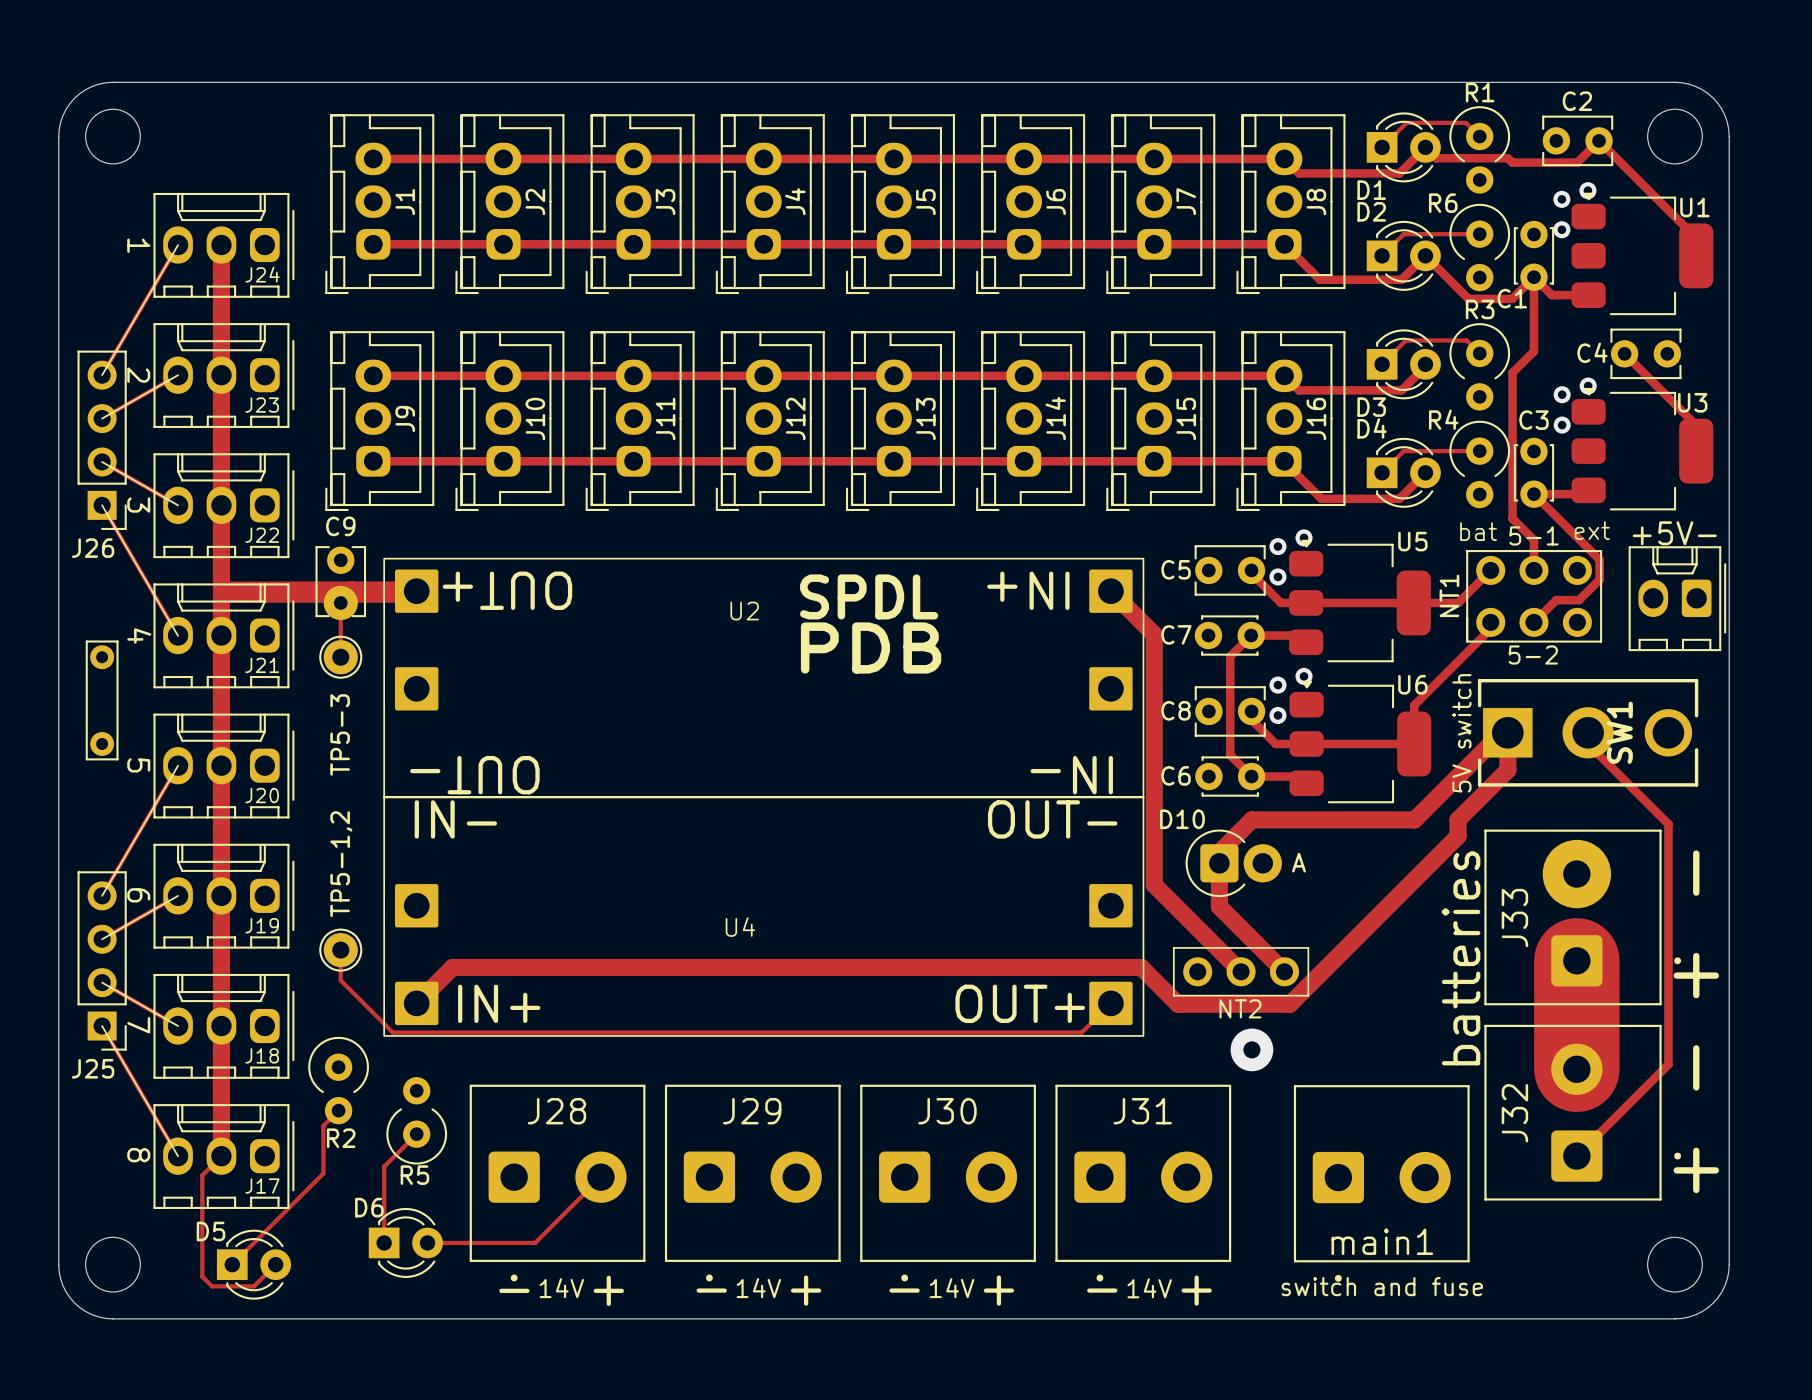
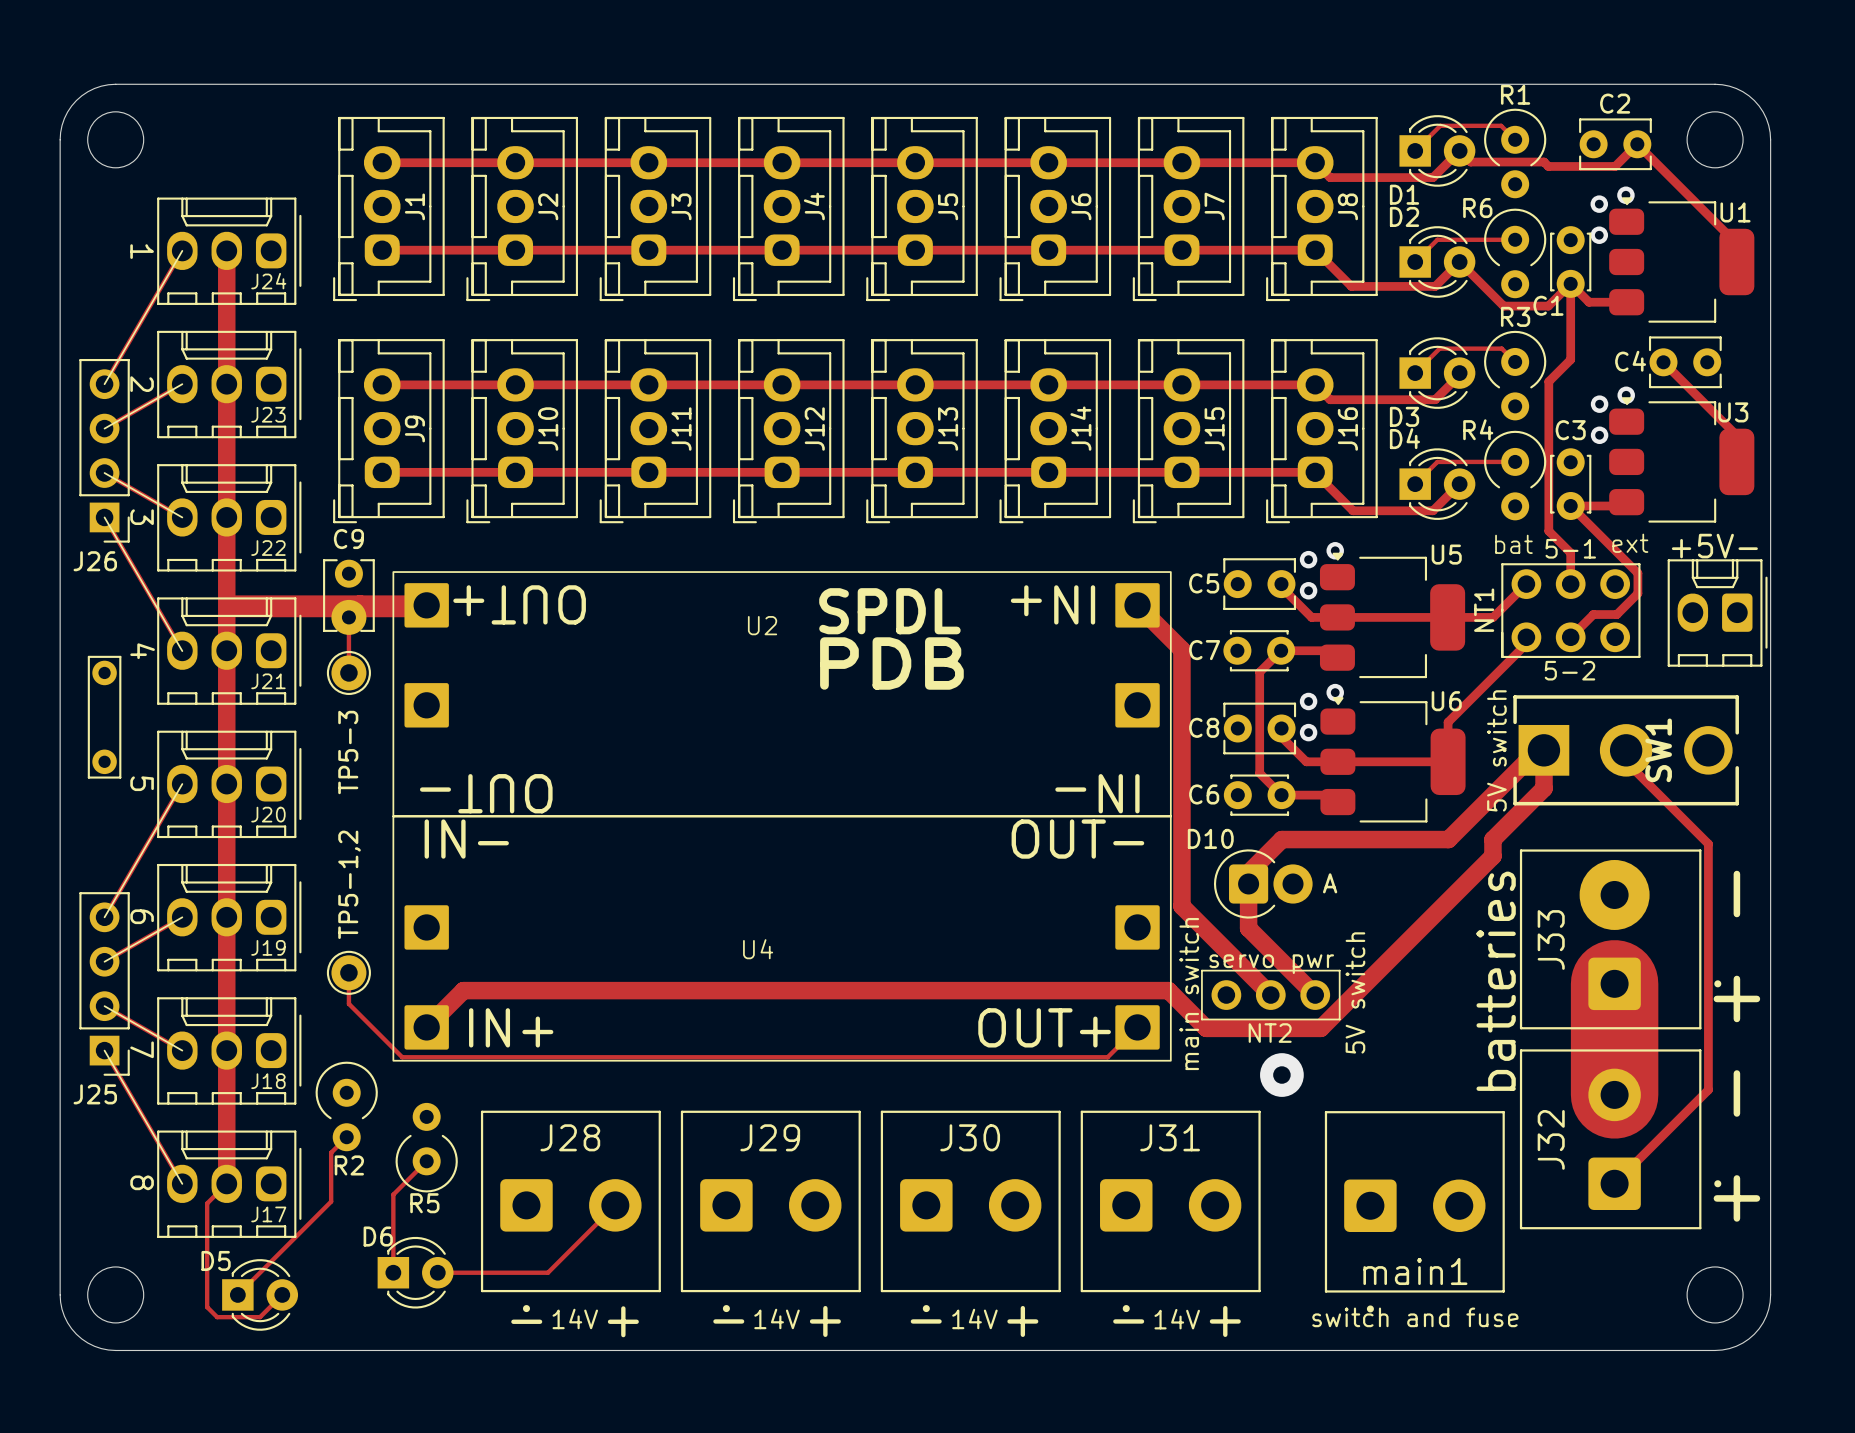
text: none -> servo pwr (1271, 964)
text: none -> 5V switch (1355, 992)
text: none -> main switch (1189, 994)

